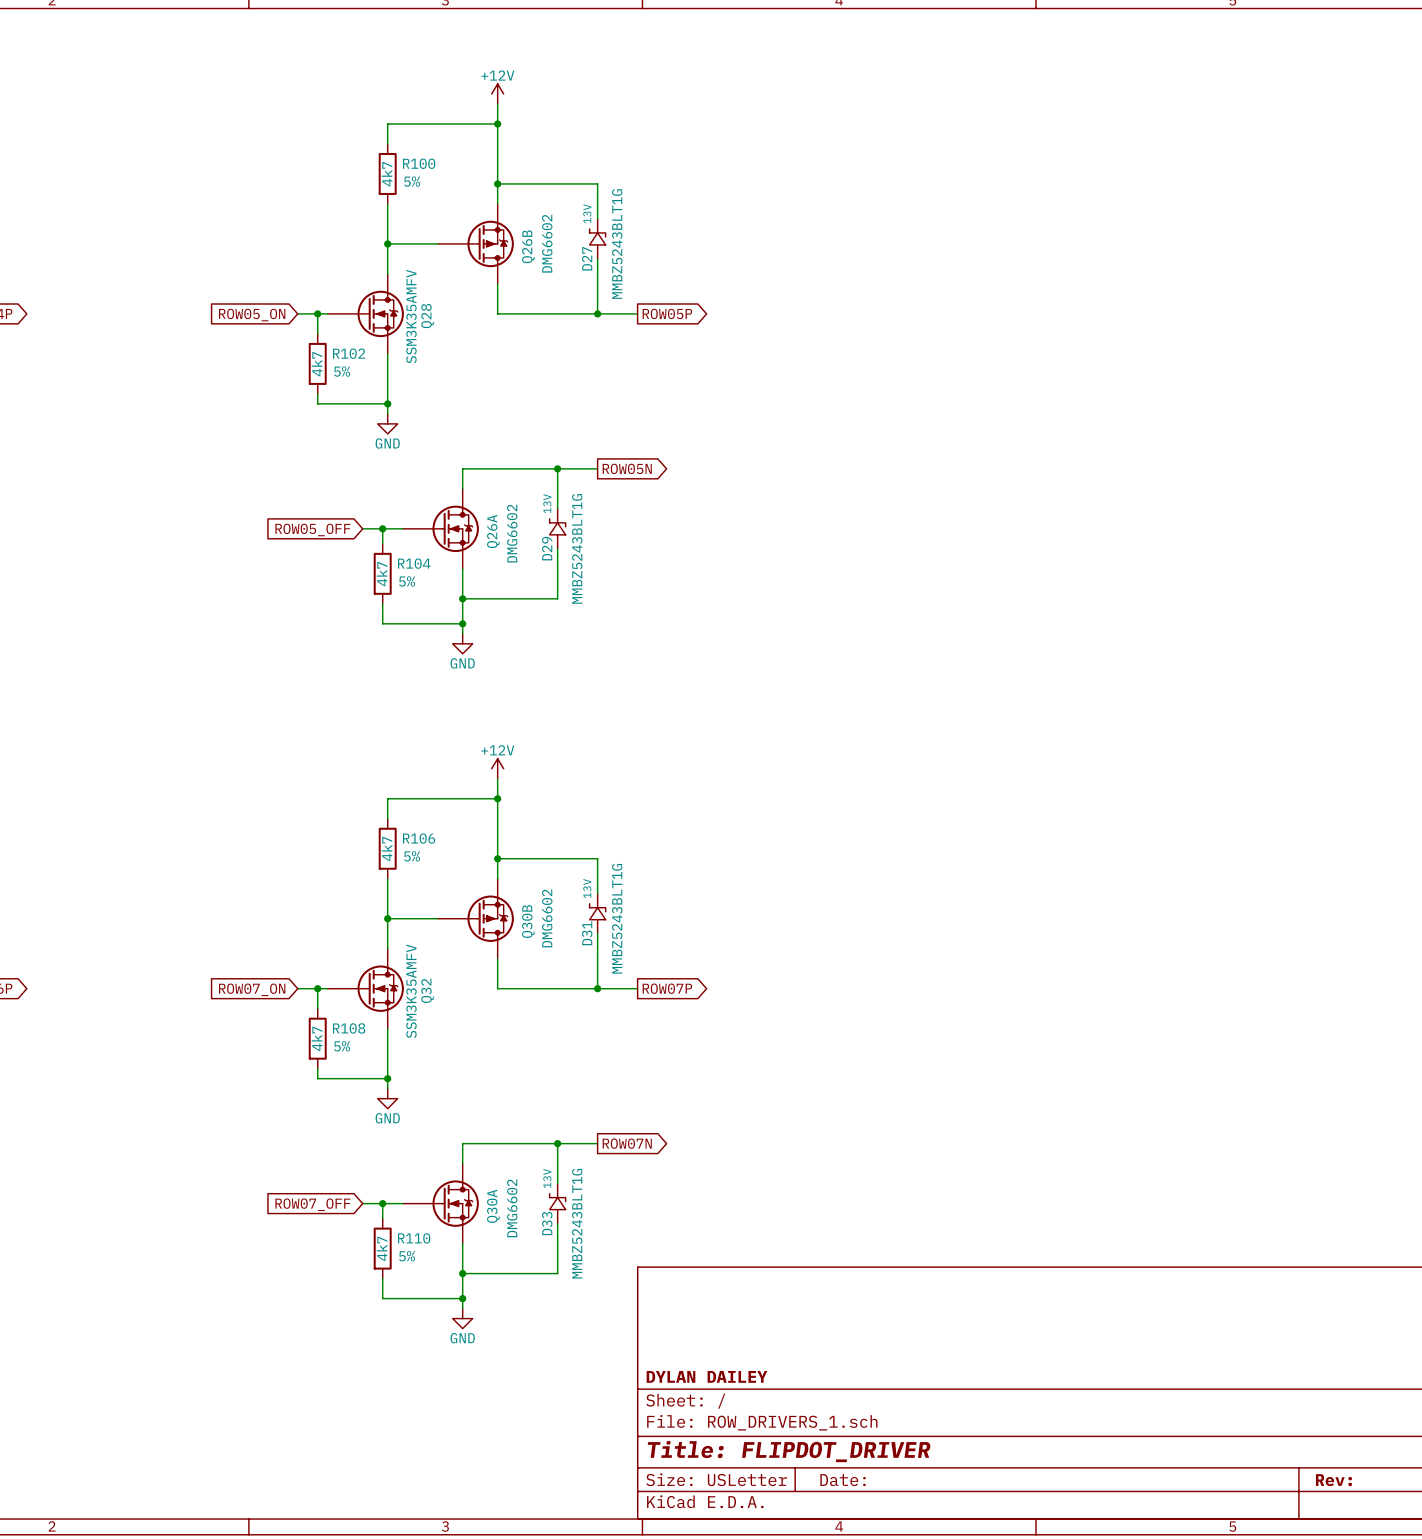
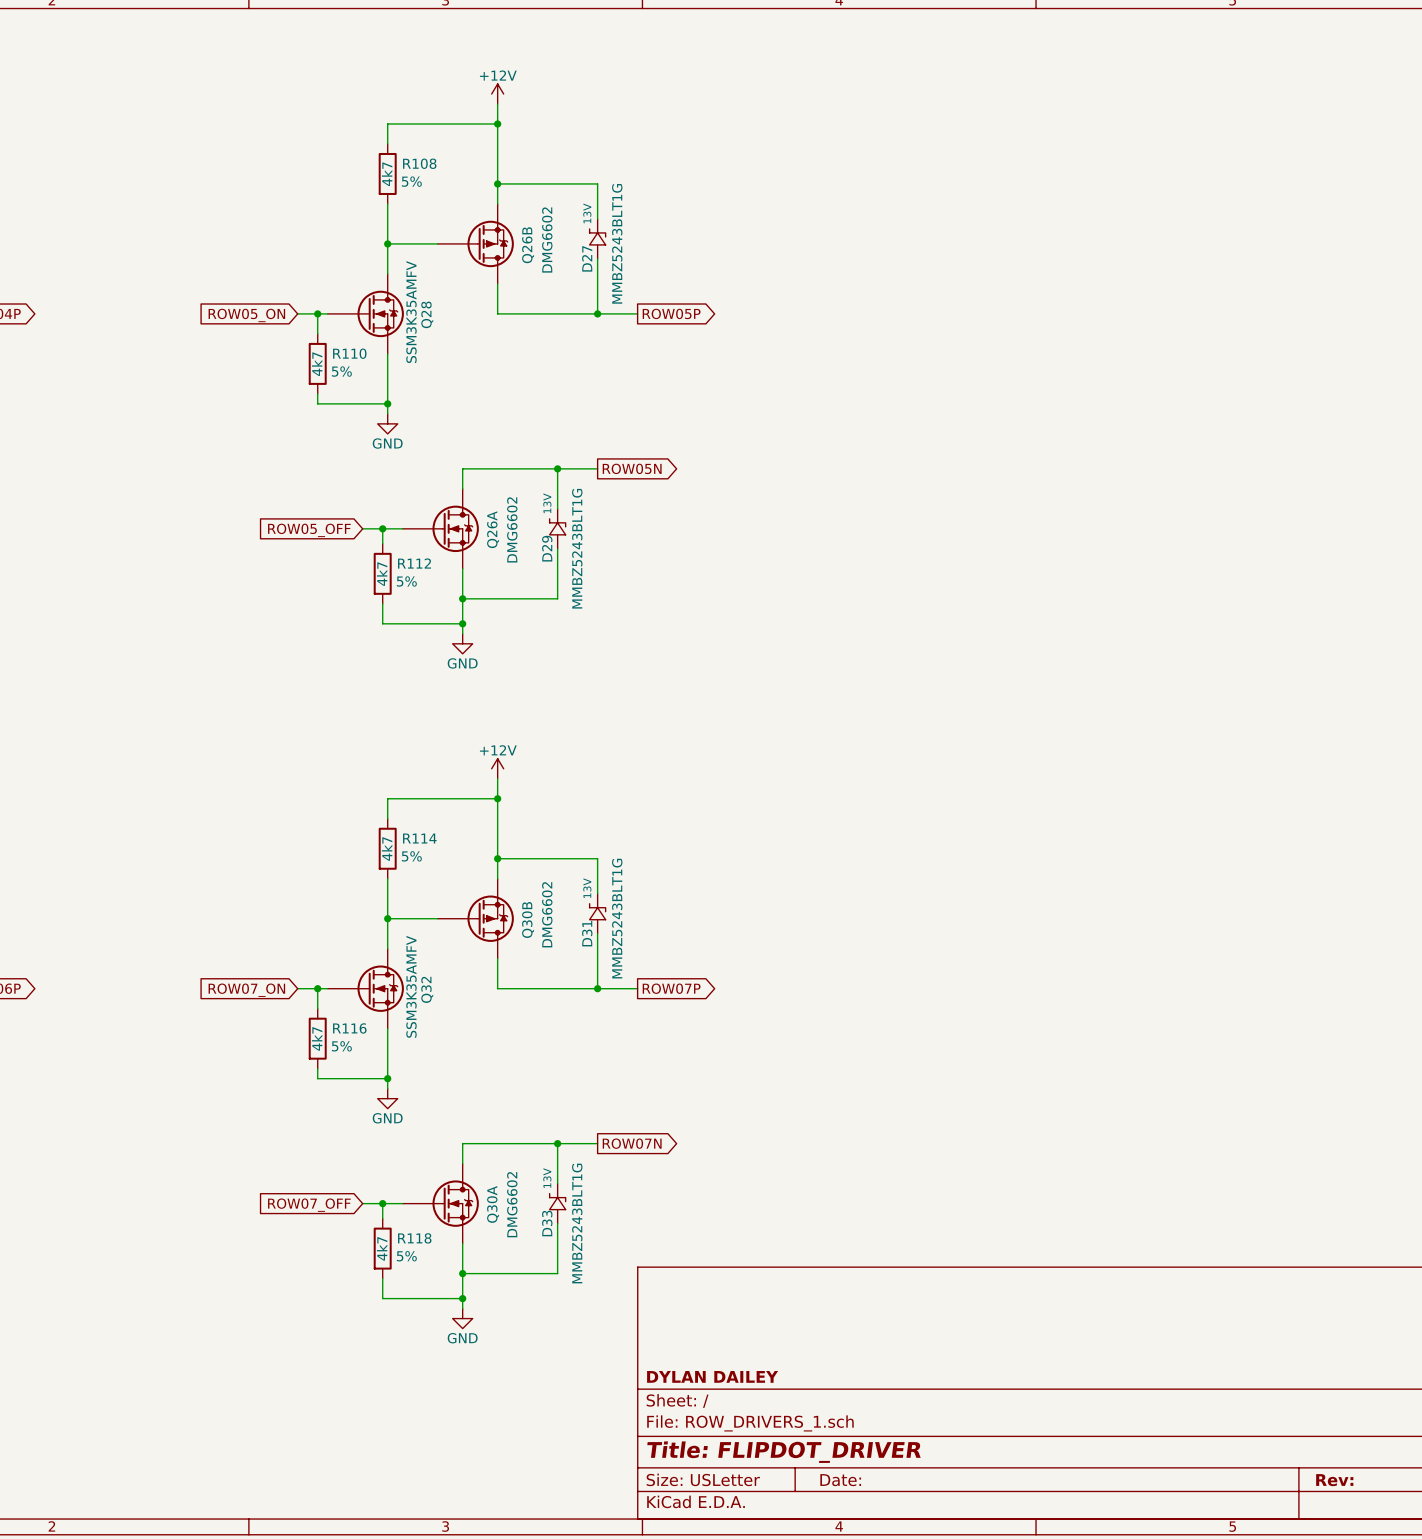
R100 name: R100 (419, 163) -> R108 (419, 163)
R102 name: R102 (349, 353) -> R110 (349, 353)
R104 name: R104 (414, 563) -> R112 (414, 563)
R106 name: R106 (419, 838) -> R114 (419, 838)
R108 name: R108 (349, 1028) -> R116 (349, 1028)
R110 name: R110 (414, 1238) -> R118 (414, 1238)

